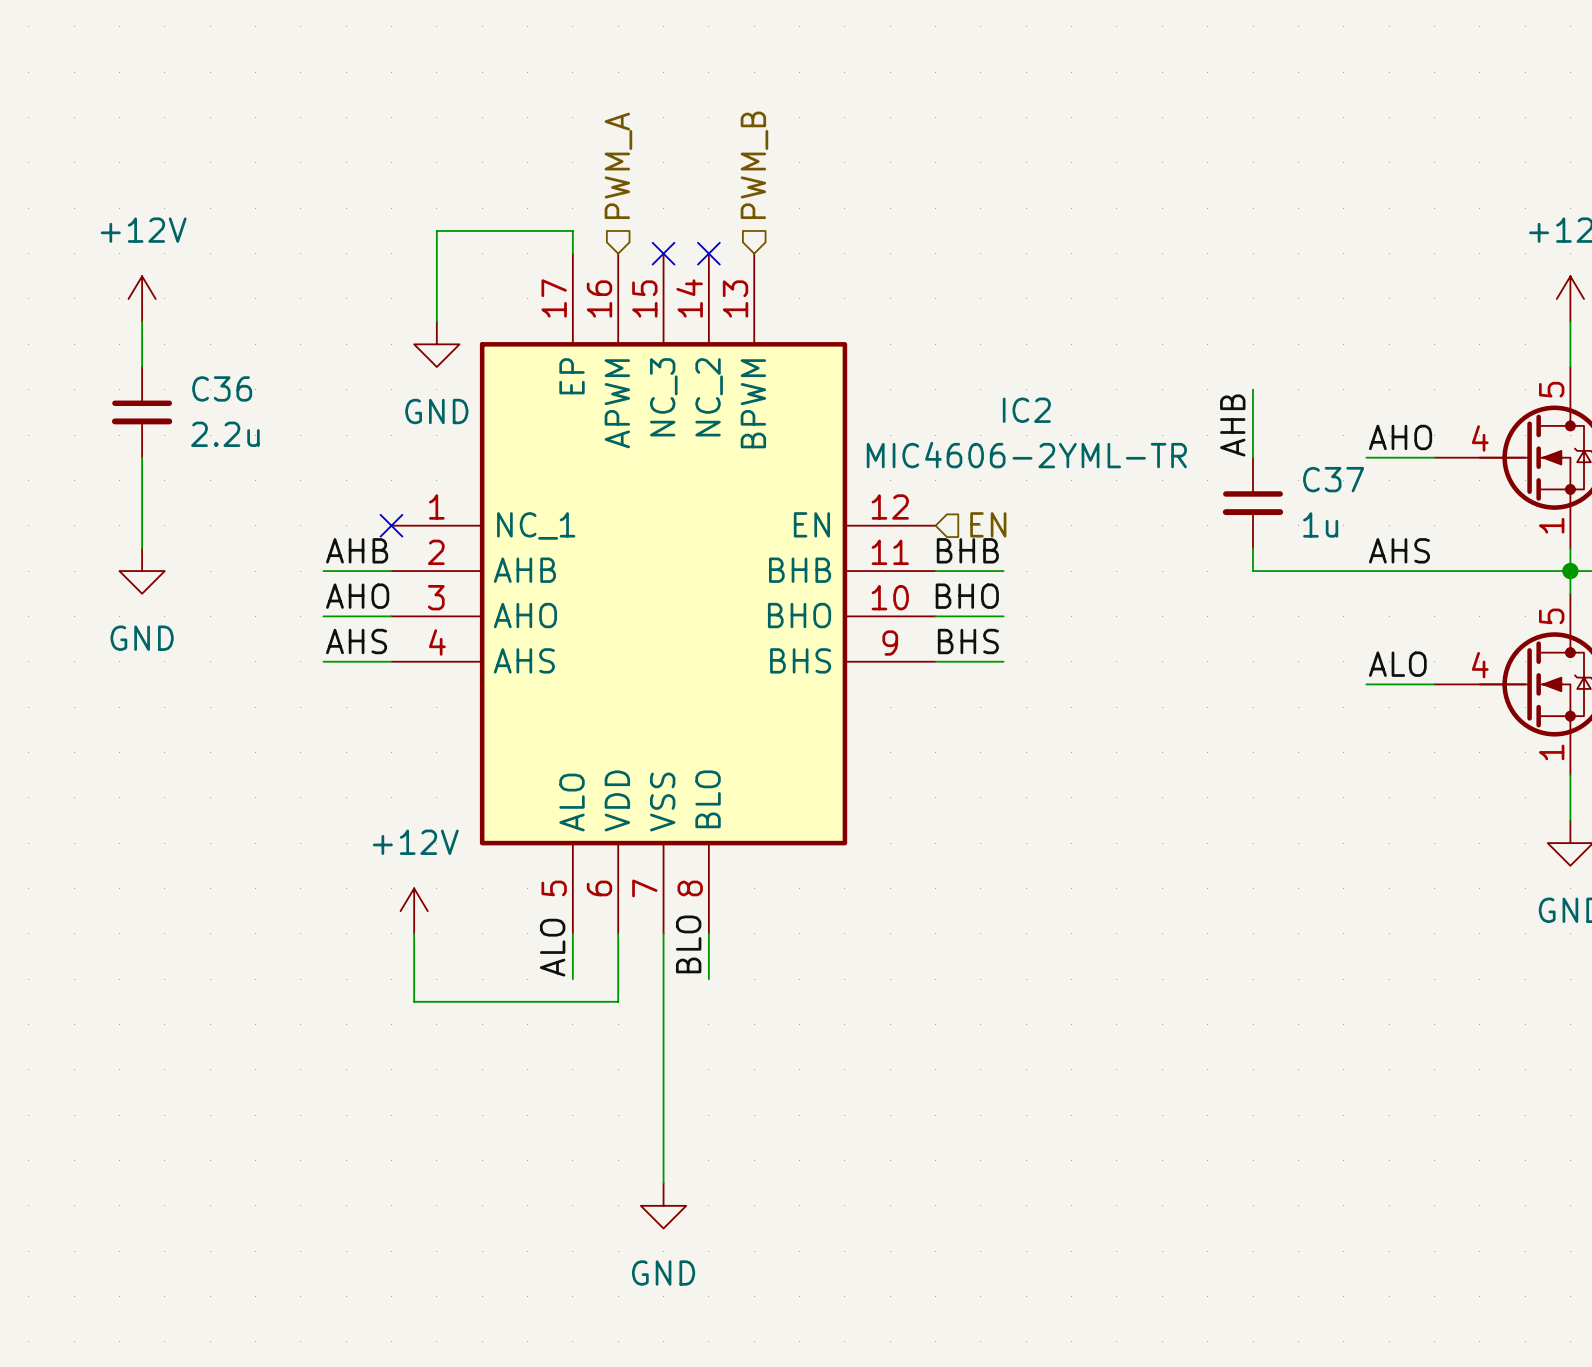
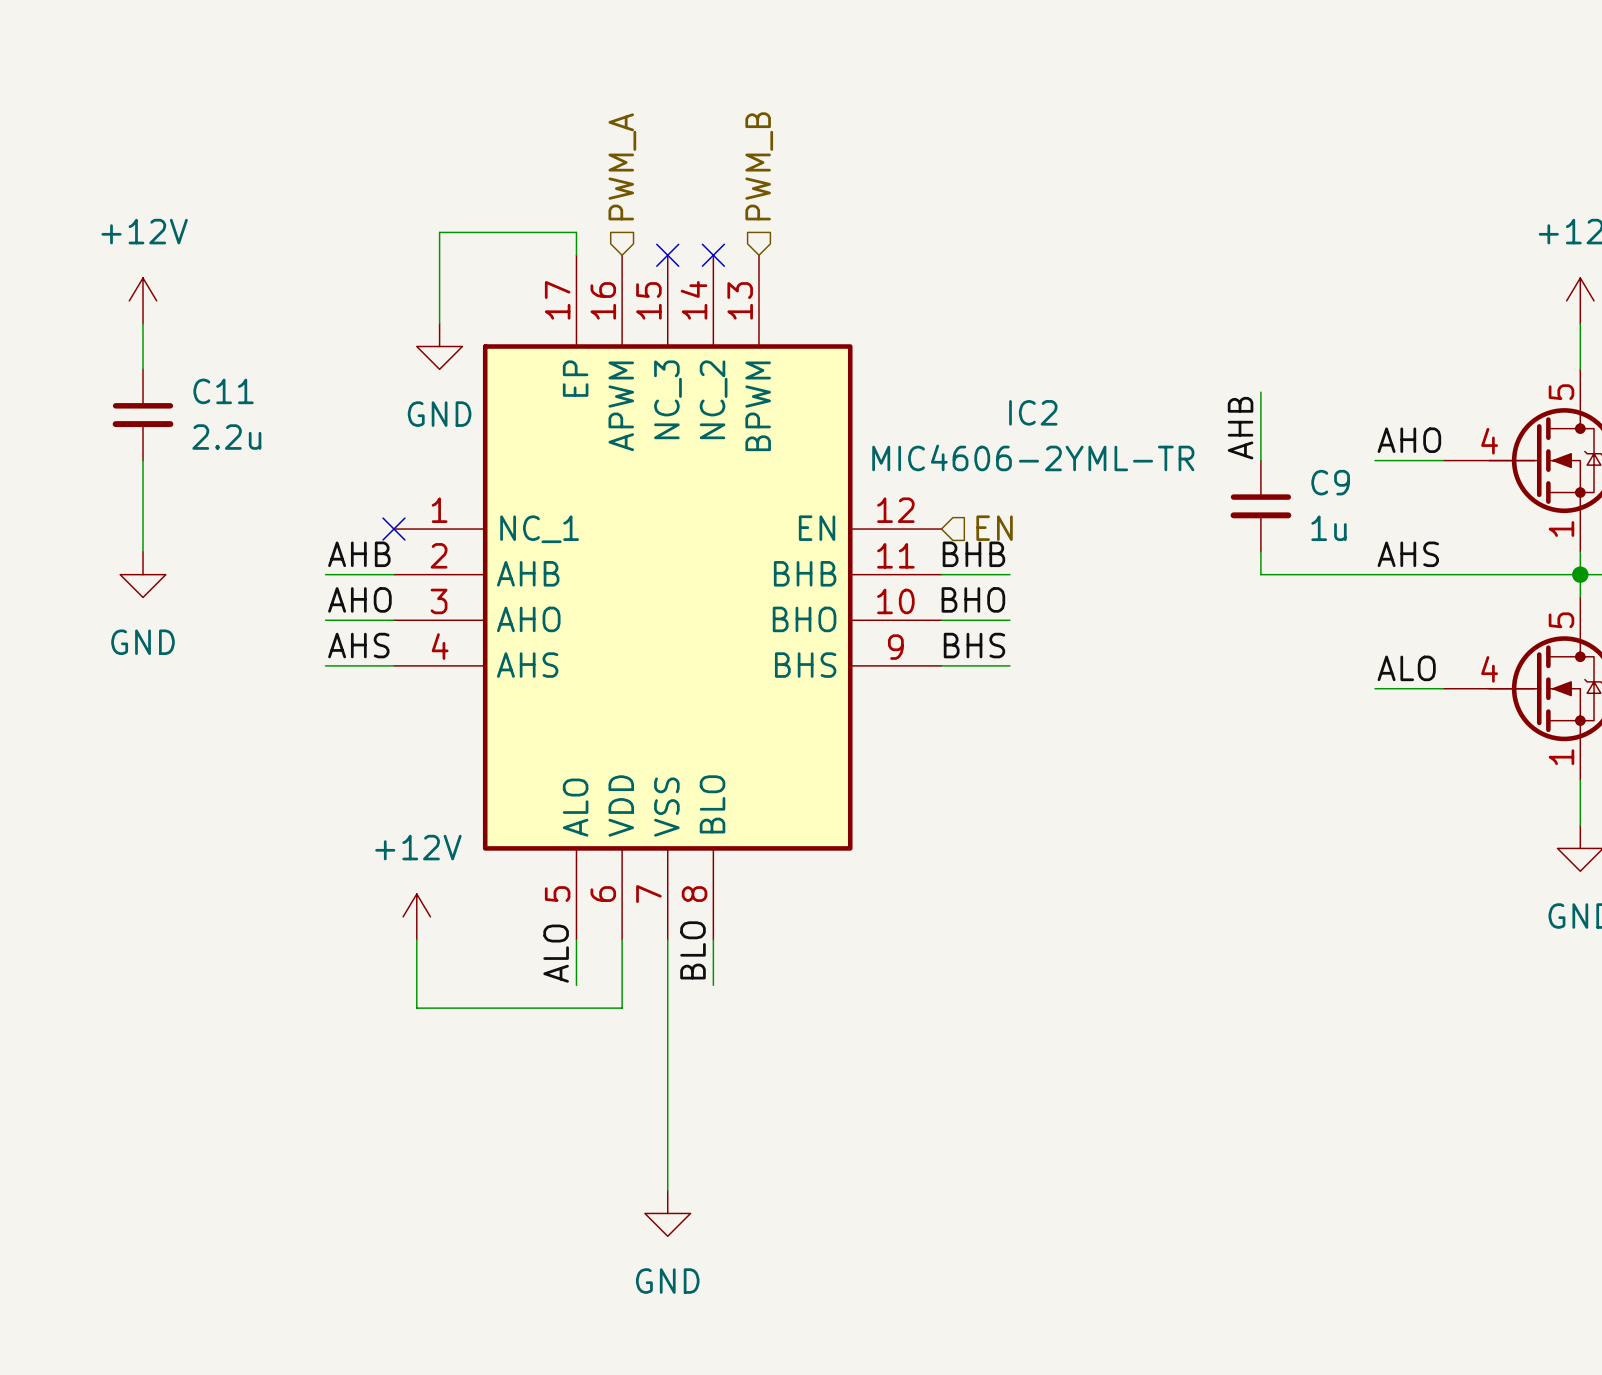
C36 name: C36 (222, 388) -> C11 (223, 391)
C37 name: C37 (1333, 479) -> C9 (1330, 482)

